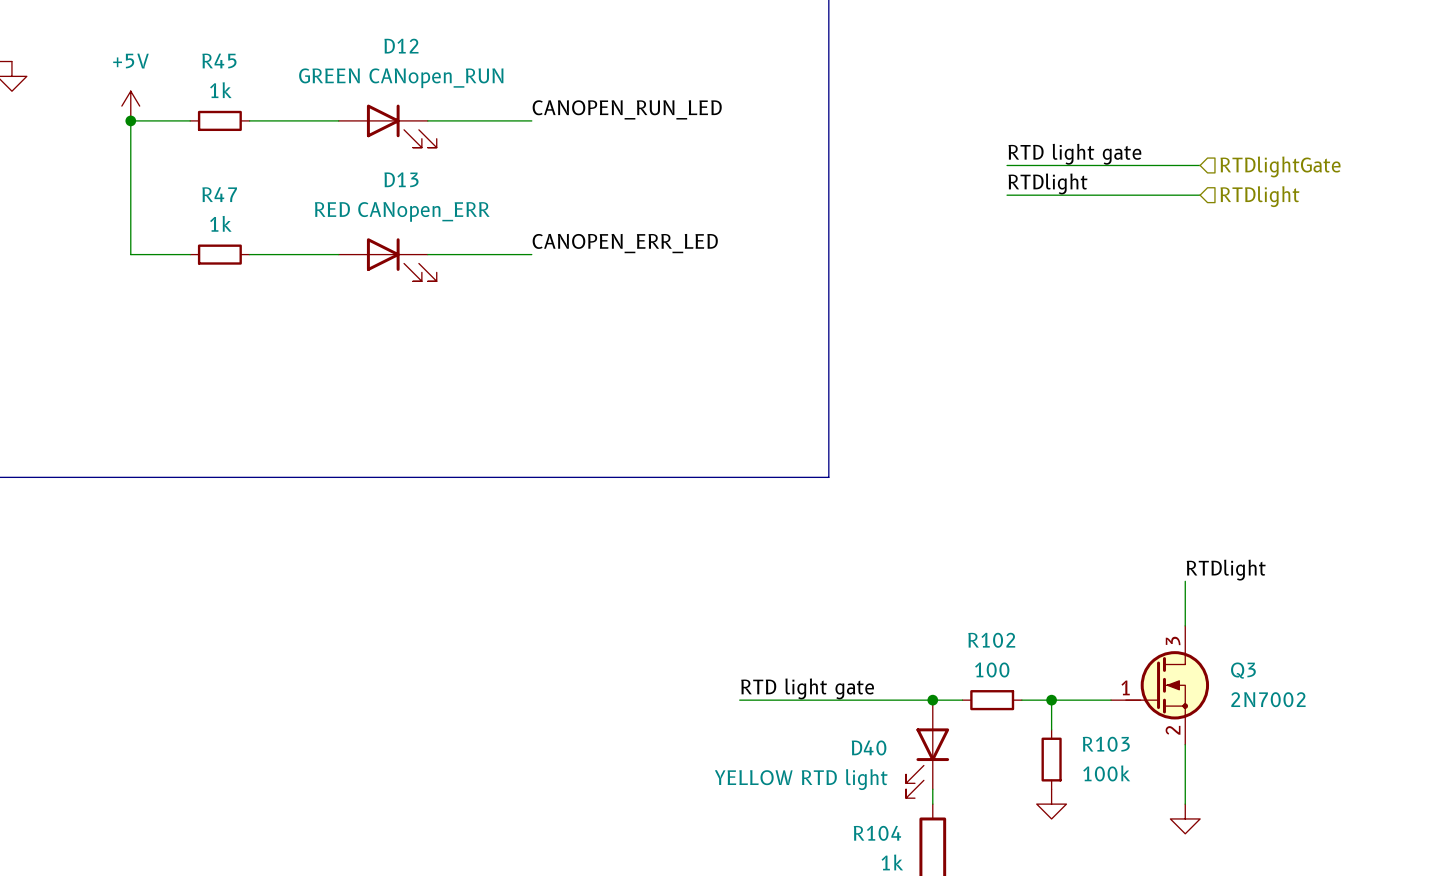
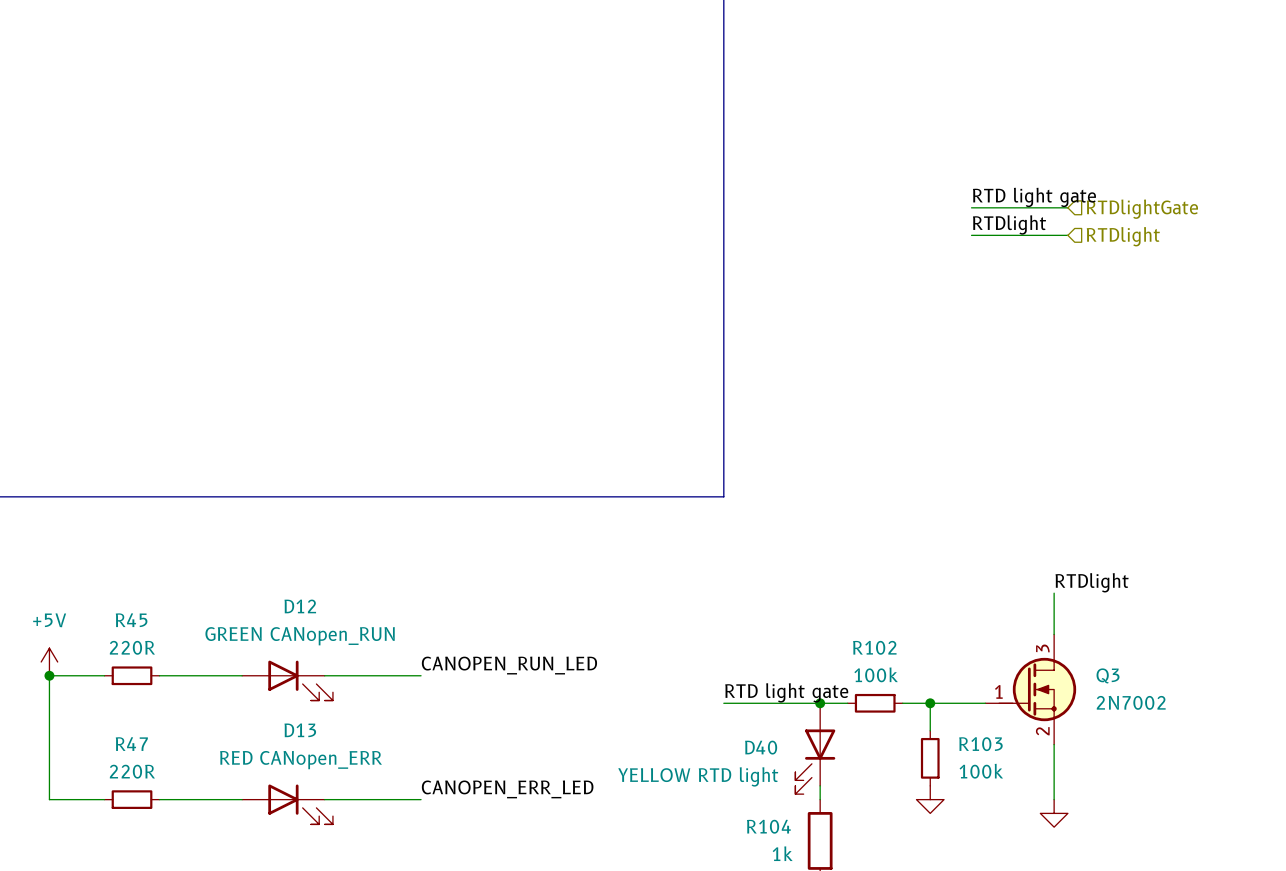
R45 value: 1k (220, 90) -> 220R (132, 647)
power symbol: +5V (130, 106) -> none
label: CANOPEN_RUN_LED (627, 109) -> none
junction: (130, 120) -> none
wire: (190, 120) (130, 120) (130, 254) (190, 254) -> none
R45 position: (219, 120) -> (132, 675)
wire: (249, 120) (338, 120) -> none
wire: (427, 120) (531, 120) -> none
D12 position: (387, 126) -> (287, 680)
label position: RTD light gate (1074, 154) -> RTD light gate (1034, 197)
wire: (1007, 165) (1096, 165) -> none
label position: RTDlight (1047, 183) -> RTDlight (1009, 224)
wire: (1007, 195) (1096, 195) -> none
R47 value: 1k (220, 223) -> 220R (132, 771)
label: CANOPEN_ERR_LED (625, 243) -> none
R47 position: (219, 254) -> (132, 799)
wire: (249, 254) (338, 254) -> none
wire: (427, 254) (531, 254) -> none
D13 position: (387, 259) -> (287, 804)
power symbol: none -> +5V (49, 662)
label: none -> CANOPEN_RUN_LED (509, 665)
R102 value: 100 (992, 669) -> 100k (876, 674)
junction: none -> (49, 675)
wire: none -> (104, 675) (49, 675) (49, 799) (104, 799)
wire: none -> (159, 675) (242, 675)
wire: none -> (324, 675) (421, 675)
label position: RTD light gate (807, 688) -> RTD light gate (786, 692)
wire: (739, 700) (828, 700) -> none
label: none -> CANOPEN_ERR_LED (507, 789)
wire: none -> (159, 799) (242, 799)
wire: none -> (324, 799) (421, 799)

